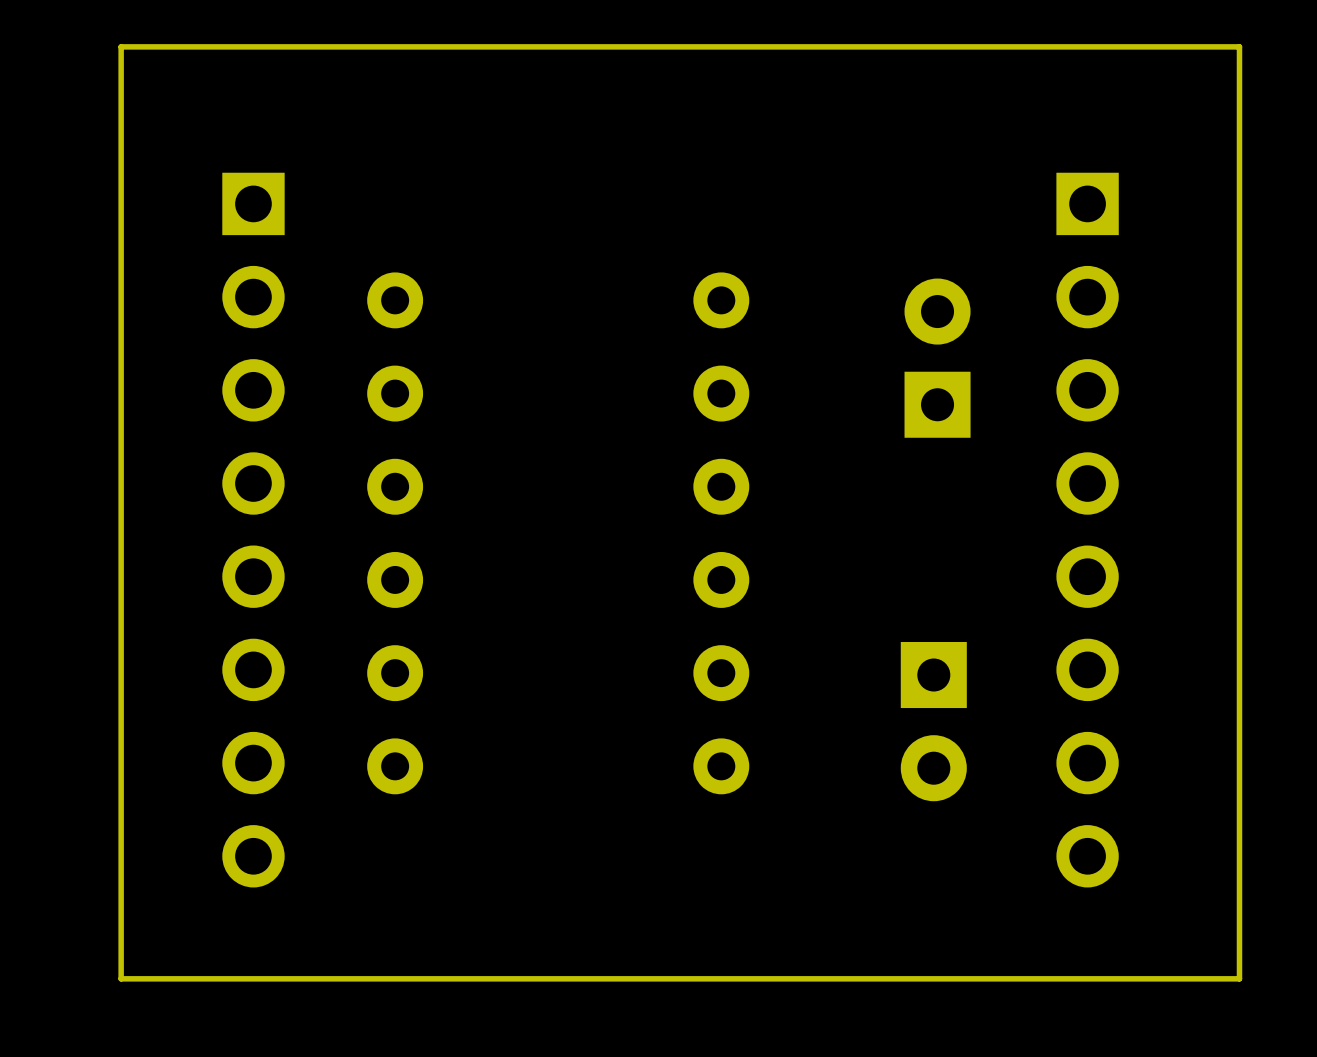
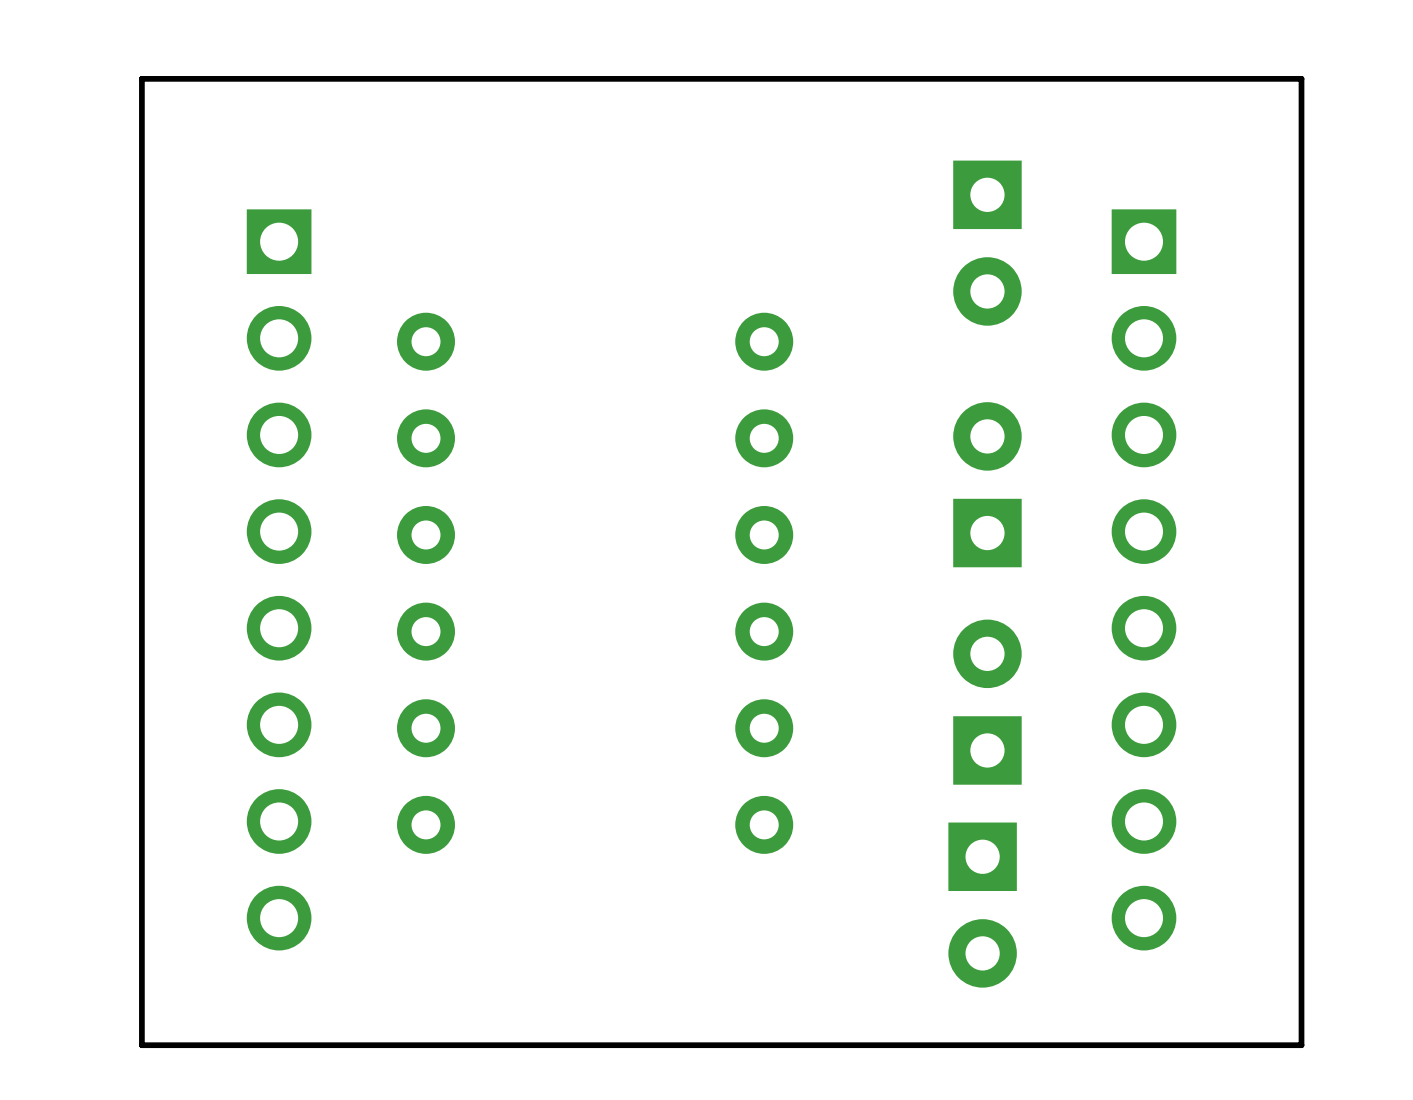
part: none -> (987, 243)
part: (937, 358) -> none
part: none -> (987, 484)
part: none -> (987, 702)
part: (933, 721) -> none
part: none -> (982, 905)

